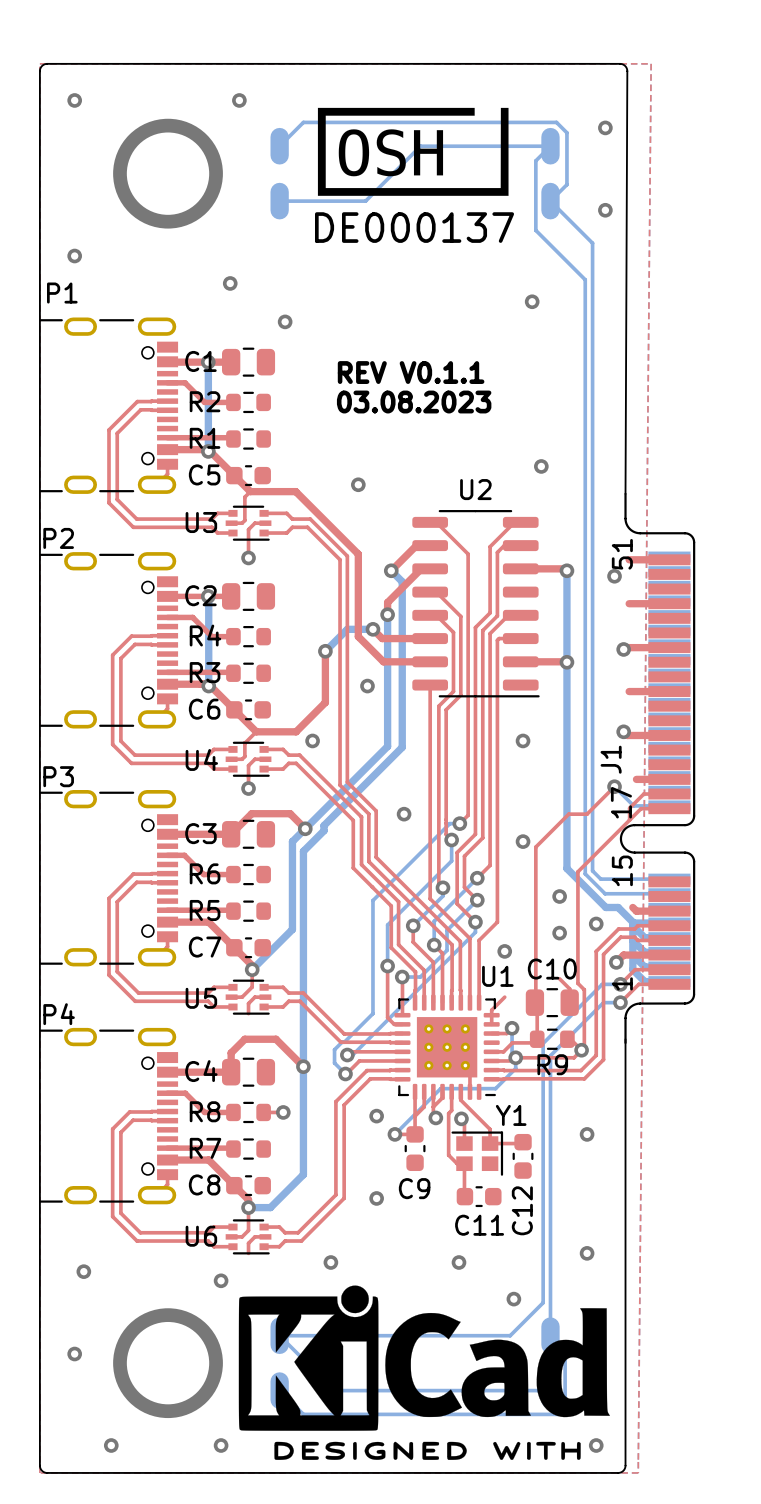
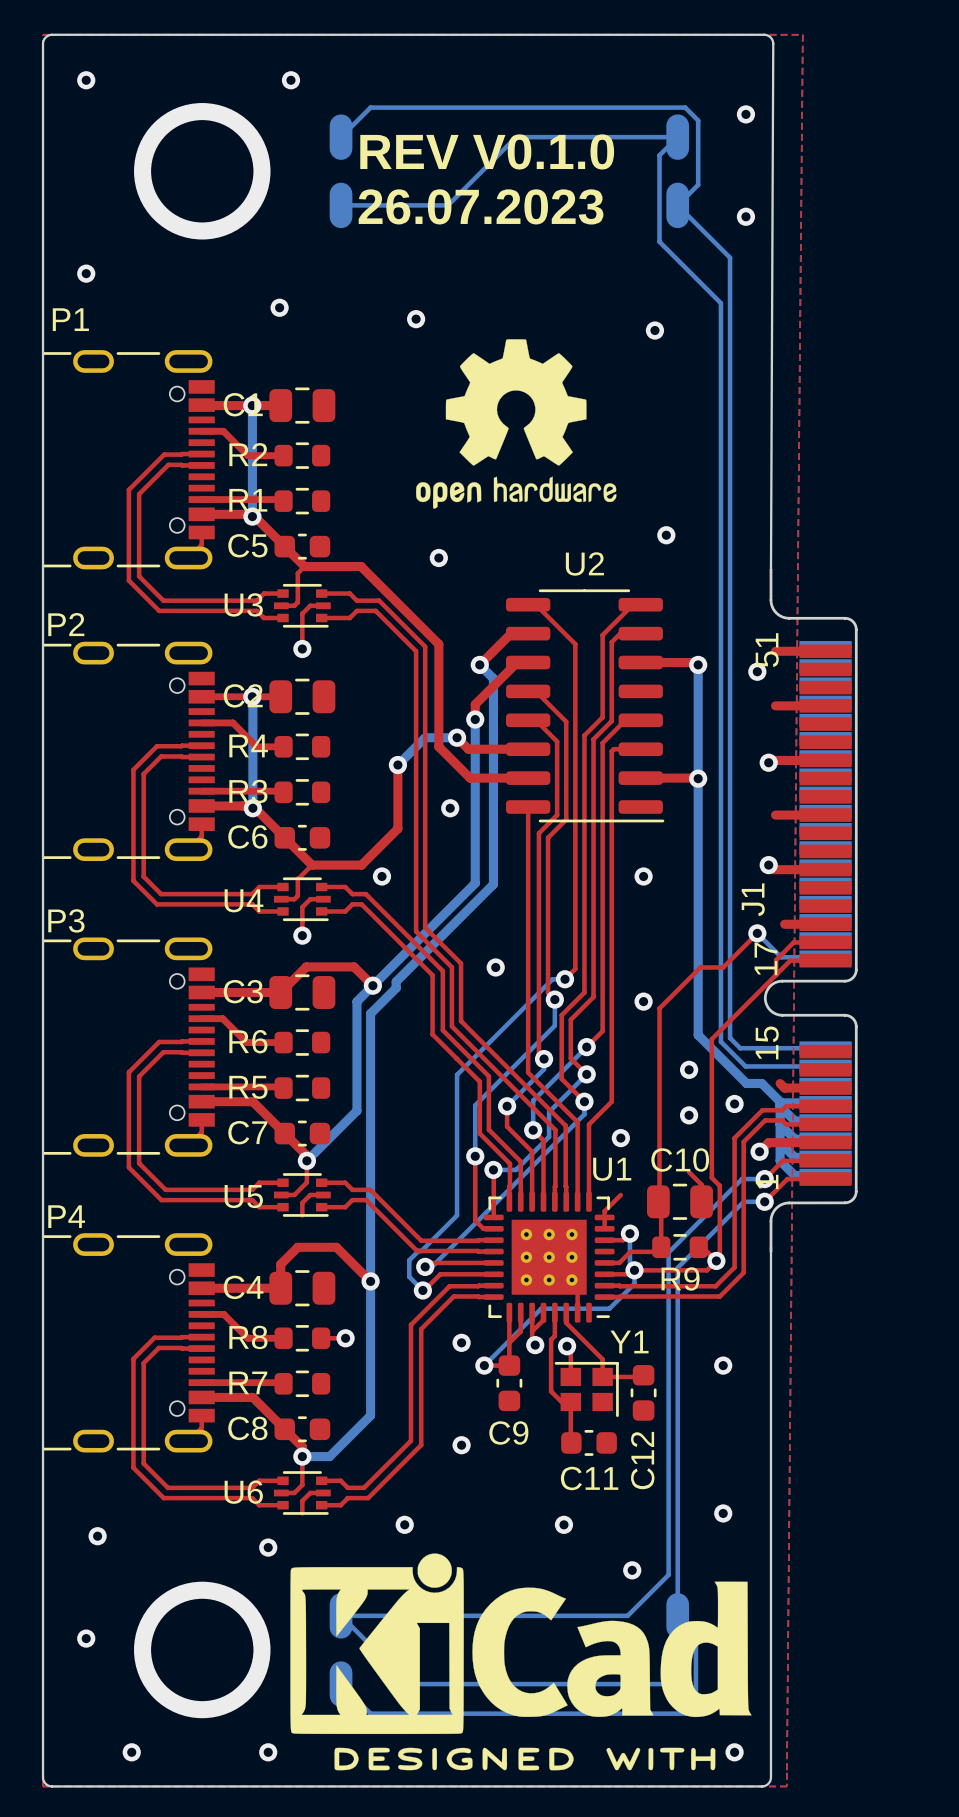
drawing: [317, 107, 509, 196] -> none
text: none -> REV V0.1.0 (487, 151)
text: none -> 26.07.2023 (481, 206)
drawing: none -> [416, 339, 617, 509]
via position: (285, 321) -> (416, 319)
text: REV V0.1.1 (411, 372) -> none
text: 03.08.2023 (414, 402) -> none

